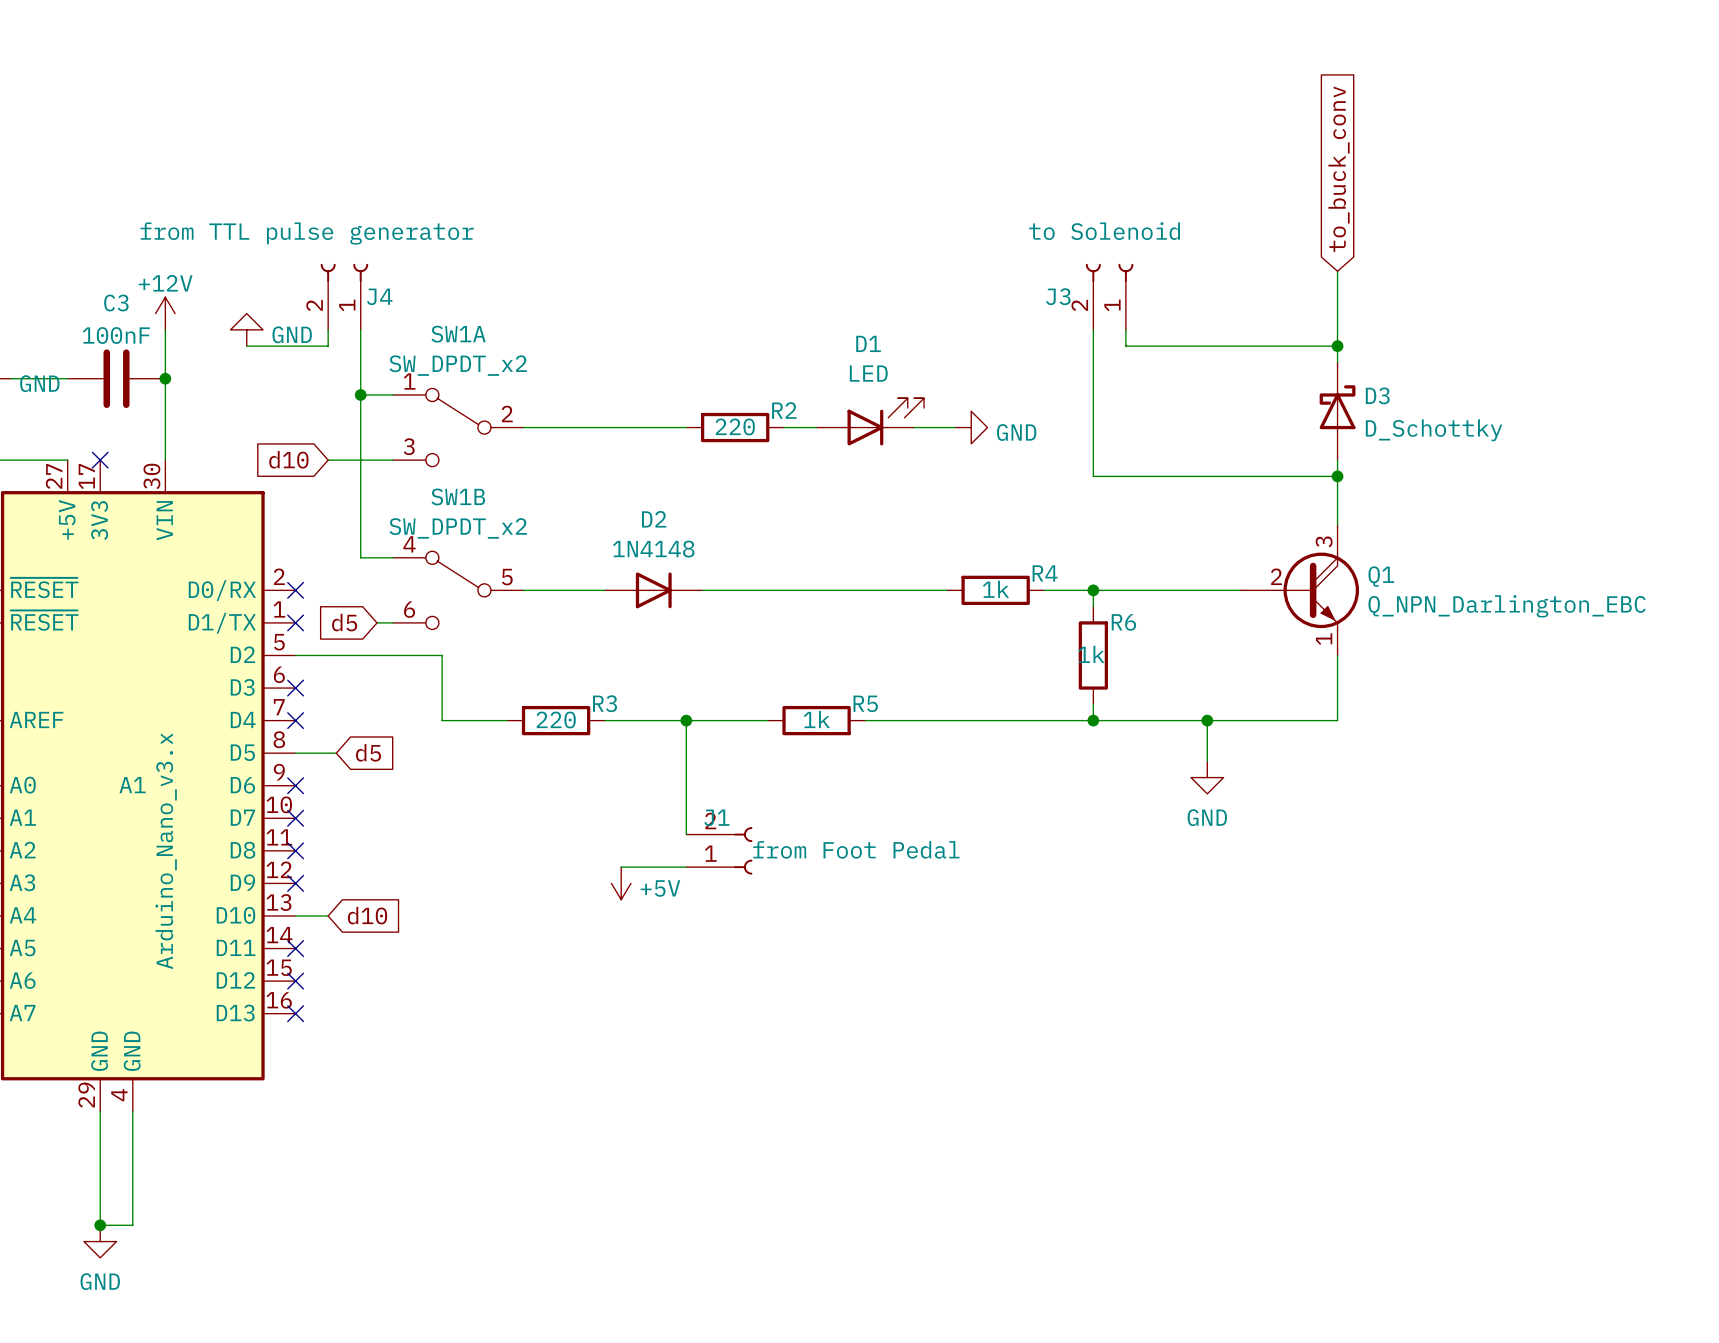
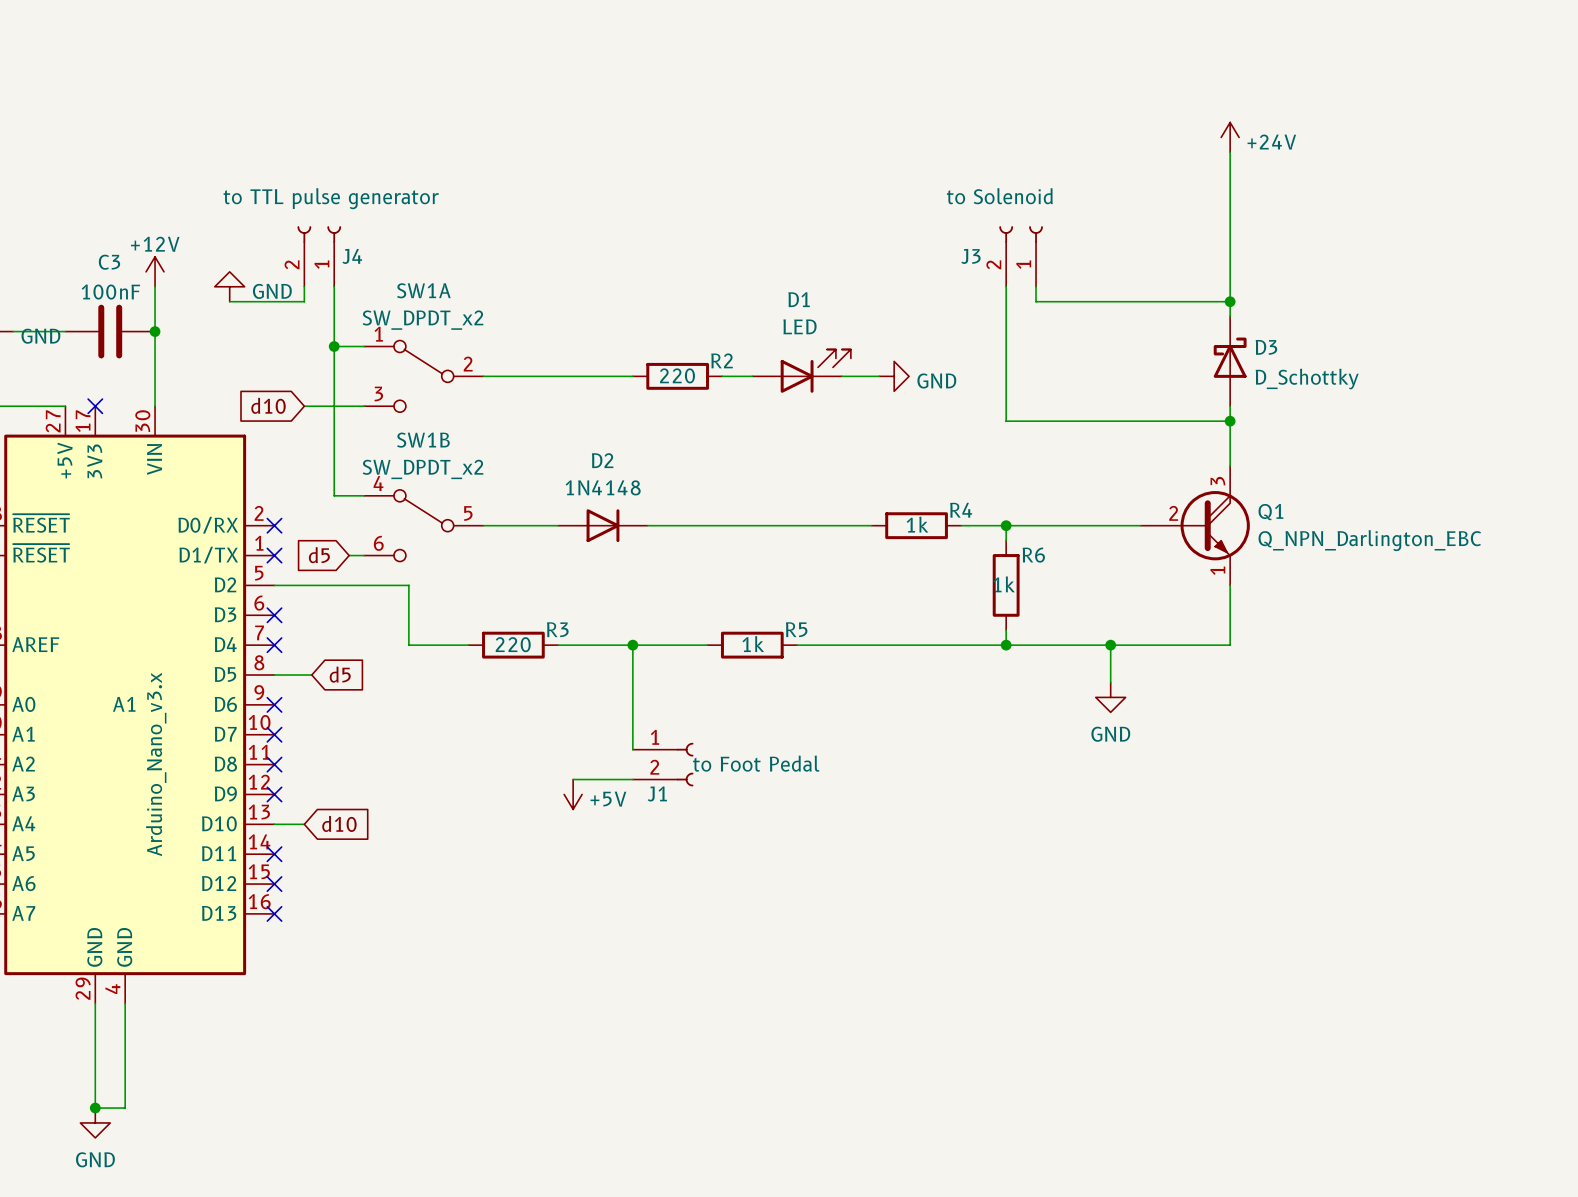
power symbol: none -> +24V (1230, 137)
global label: to_buck_conv (1339, 169) -> none
wire: none -> (1230, 152) (1230, 233)
J4 value: from TTL pulse generator (307, 233) -> to TTL pulse generator (331, 198)
J1 value: from Foot Pedal (856, 849) -> to Foot Pedal (756, 763)
J1 flip: as is (743, 850) -> up-down (685, 764)

